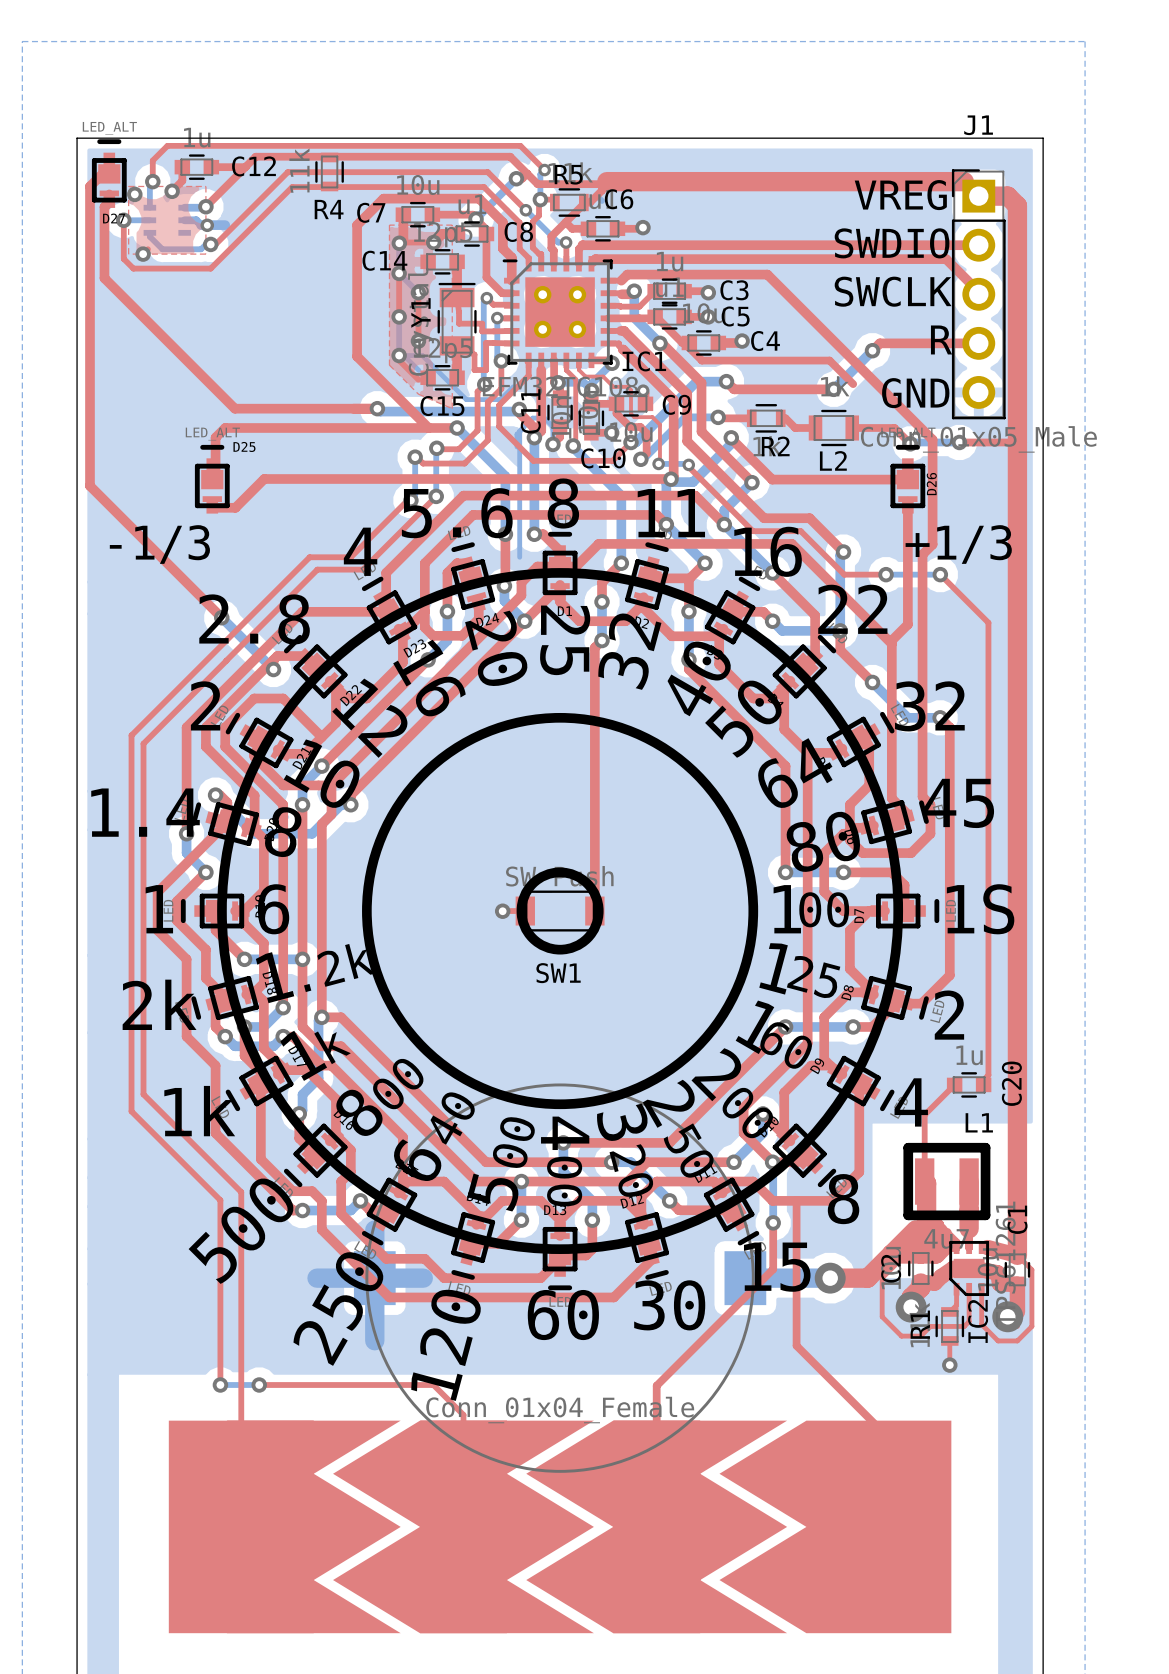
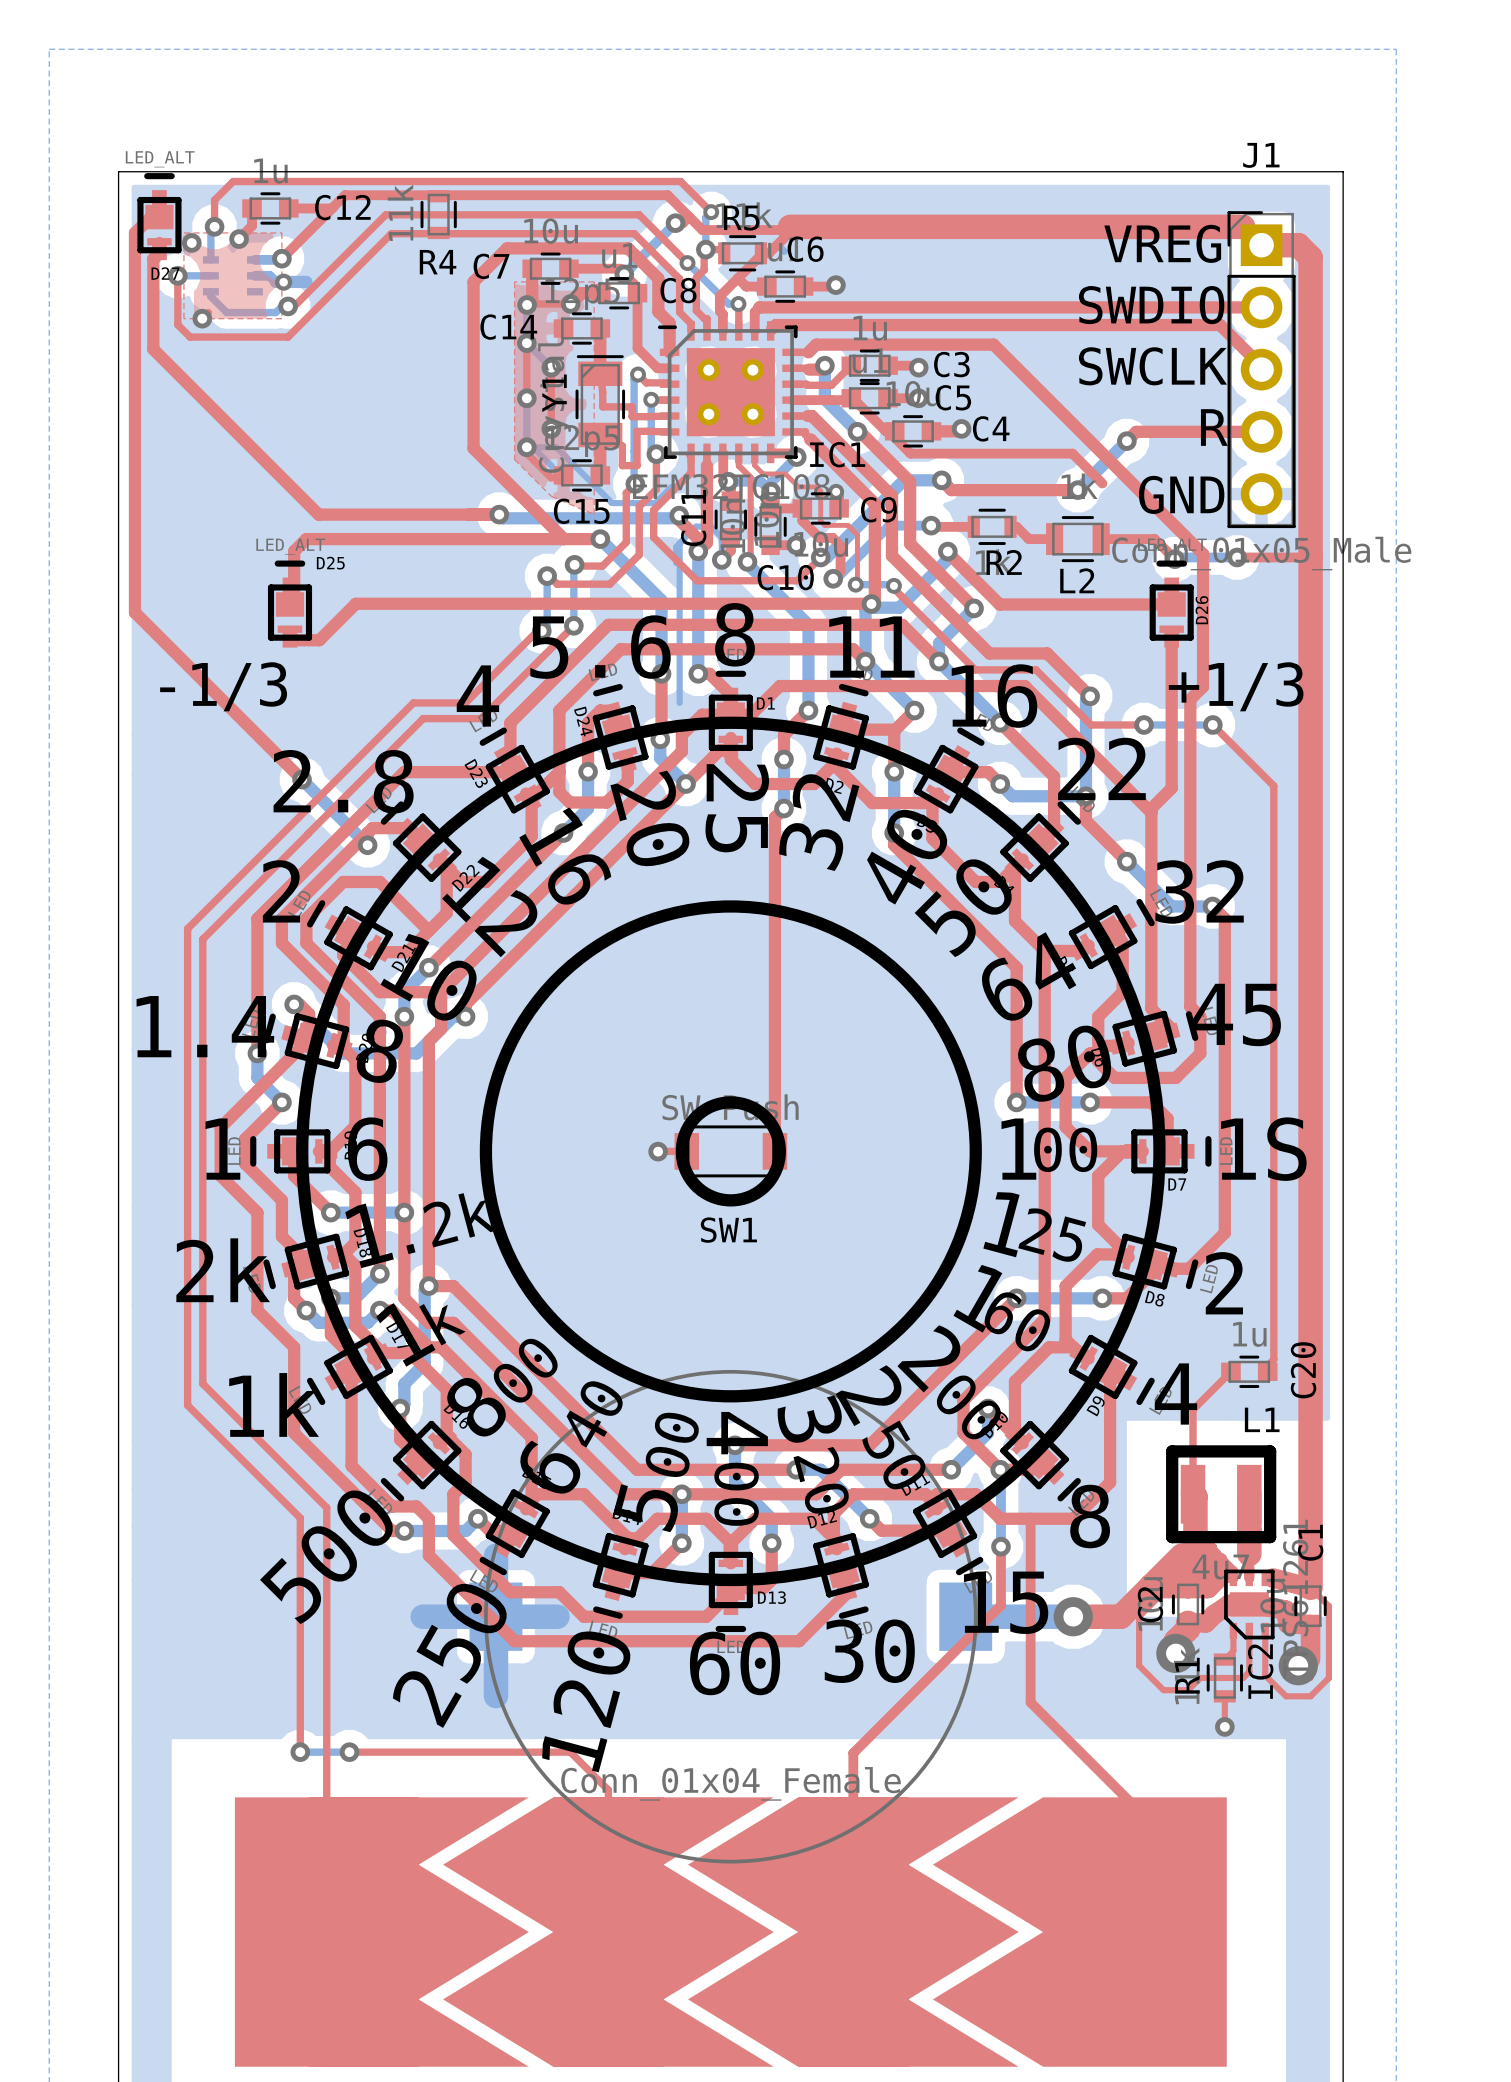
D1 name position: D1 (564, 611) -> D1 (765, 703)
D24 name rotation: 0° (487, 620) -> 90° clockwise (583, 721)
D24 name position: D24 (487, 620) -> D24 (583, 721)
D23 name rotation: 0° (414, 648) -> 90° clockwise (476, 773)
D23 name position: D23 (414, 648) -> D23 (476, 773)
D7 name rotation: 0° (859, 915) -> 90° clockwise (1177, 1184)
D7 name position: D7 (859, 915) -> D7 (1177, 1184)
D8 name rotation: 0° (847, 992) -> 90° clockwise (1154, 1298)
D8 name position: D8 (847, 992) -> D8 (1154, 1298)
D9 name position: D9 (817, 1066) -> D9 (1095, 1406)
D13 name position: D13 (555, 1210) -> D13 (771, 1597)

